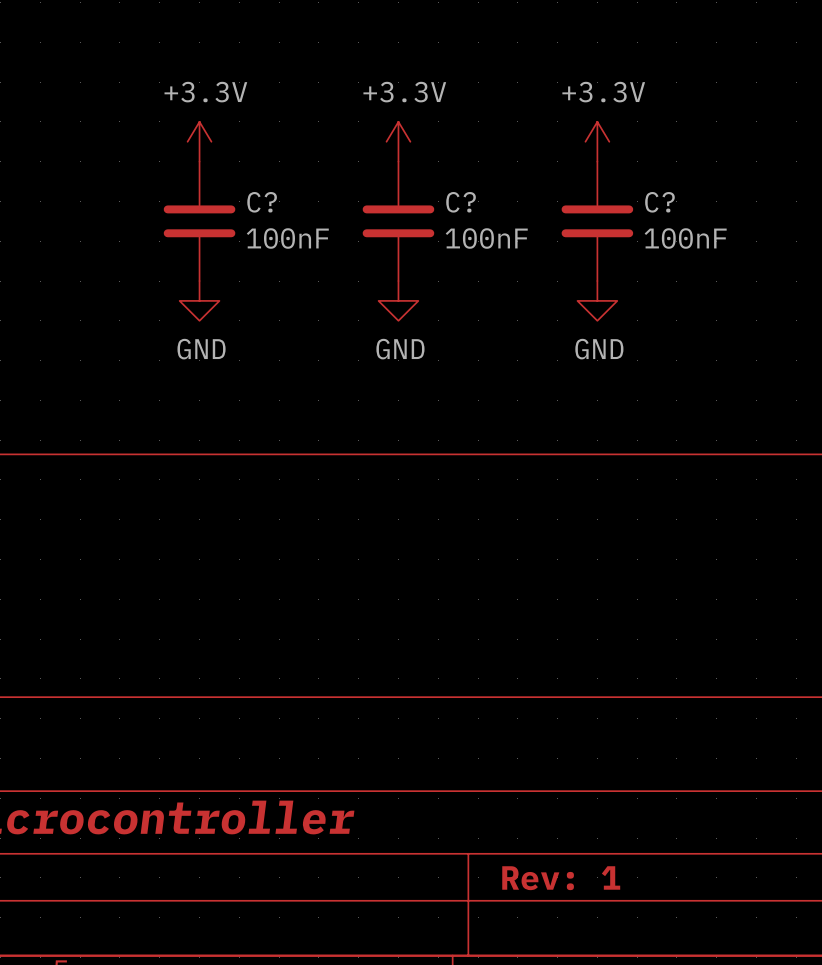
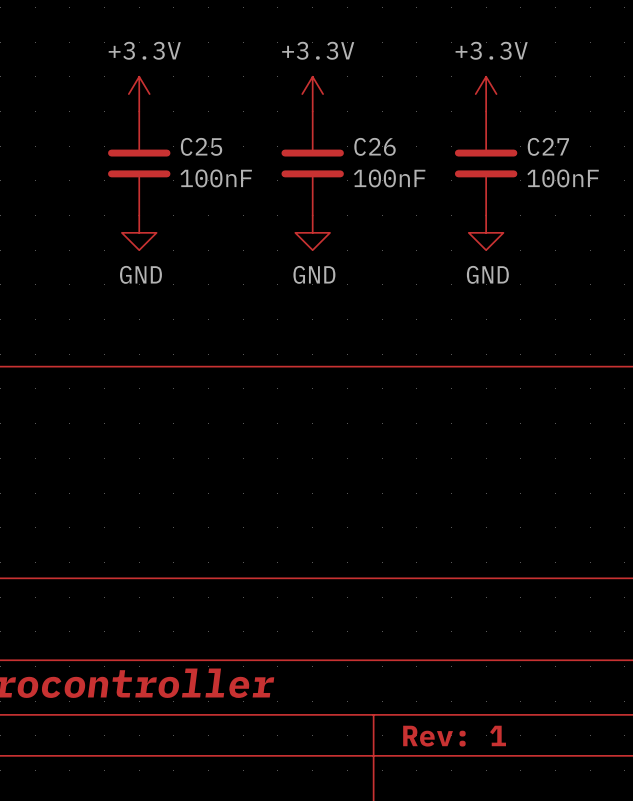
C? name: C? (262, 202) -> C25 (201, 146)
C? name: C? (461, 202) -> C26 (375, 146)
C? name: C? (659, 202) -> C27 (548, 146)

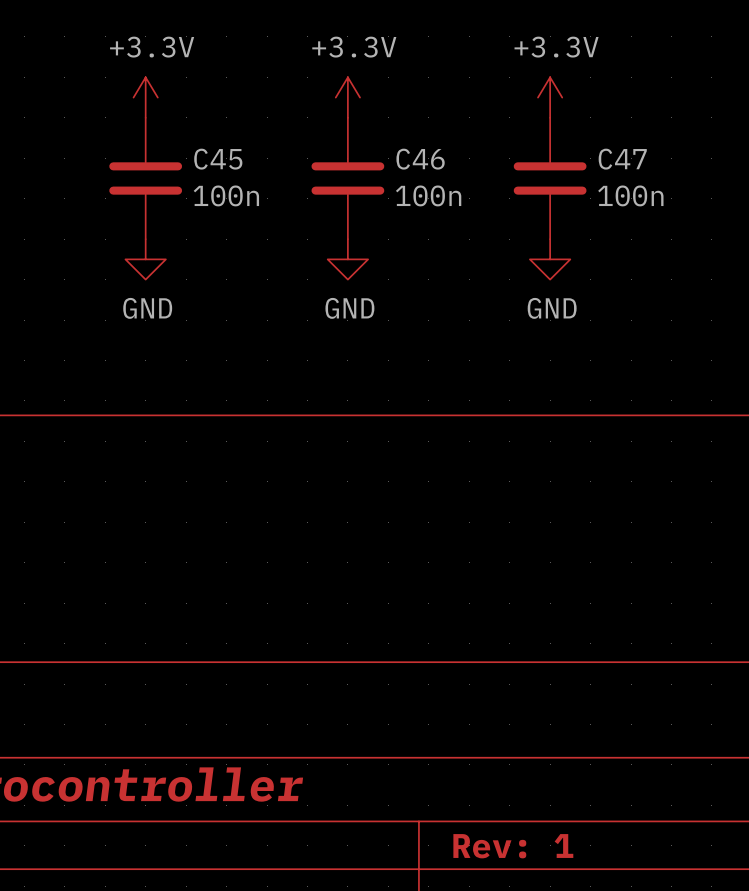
C25 name: C25 (201, 146) -> C45 (218, 159)
C26 name: C26 (375, 146) -> C46 (420, 159)
C27 name: C27 (548, 146) -> C47 (622, 159)
C25 value: 100nF (216, 178) -> 100n (226, 195)
C26 value: 100nF (389, 178) -> 100n (428, 195)
C27 value: 100nF (563, 178) -> 100n (630, 195)

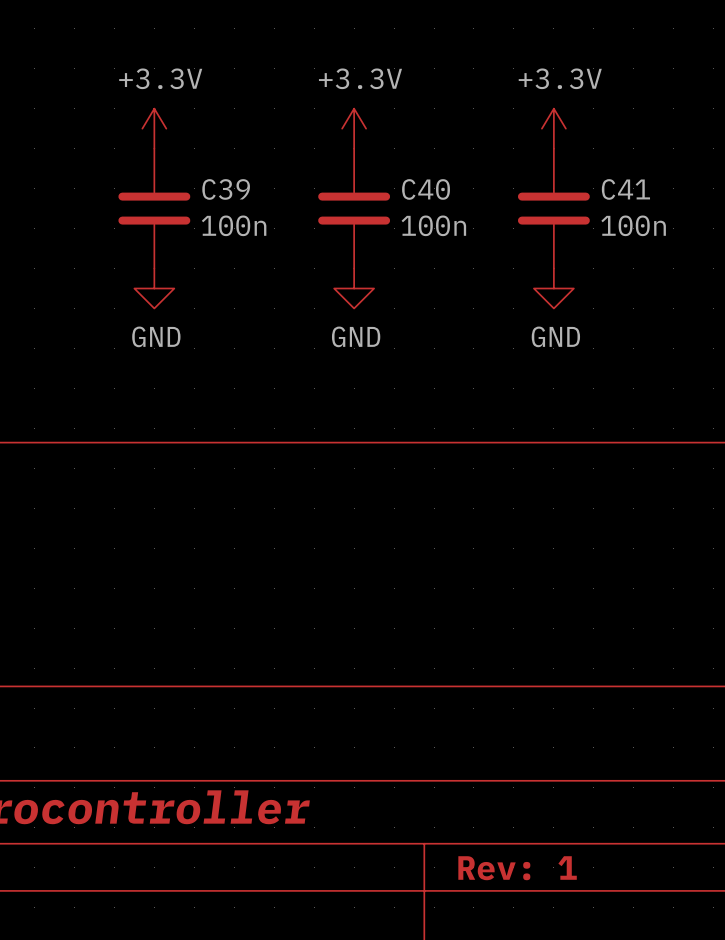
C45 name: C45 (218, 159) -> C39 (226, 189)
C46 name: C46 (420, 159) -> C40 (426, 189)
C47 name: C47 (622, 159) -> C41 (625, 189)

